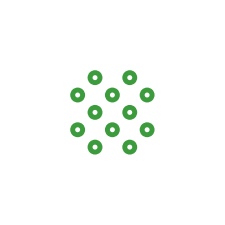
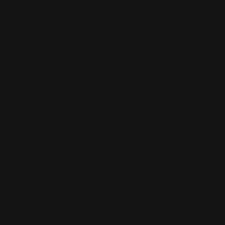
part: (112, 112) -> none

